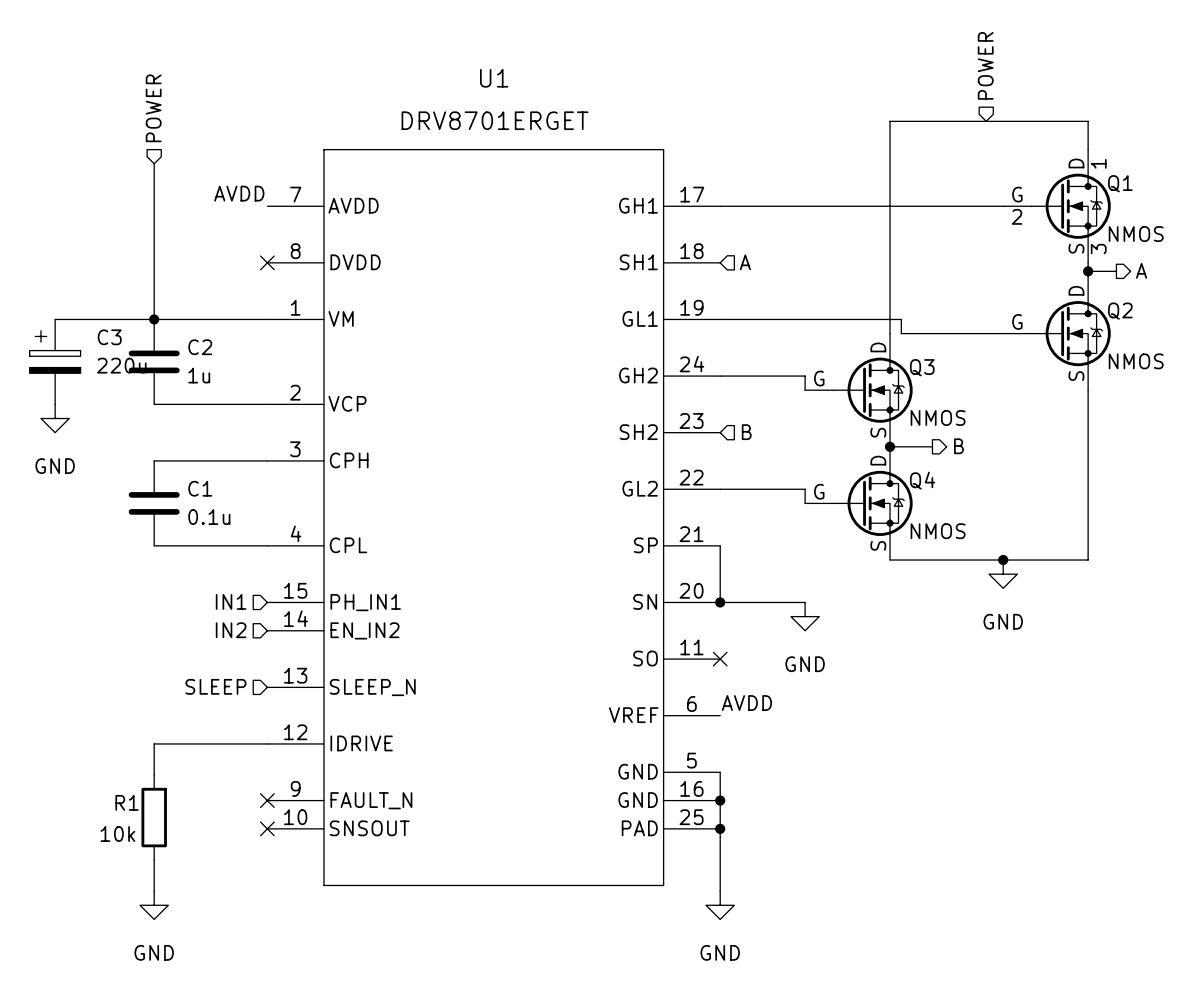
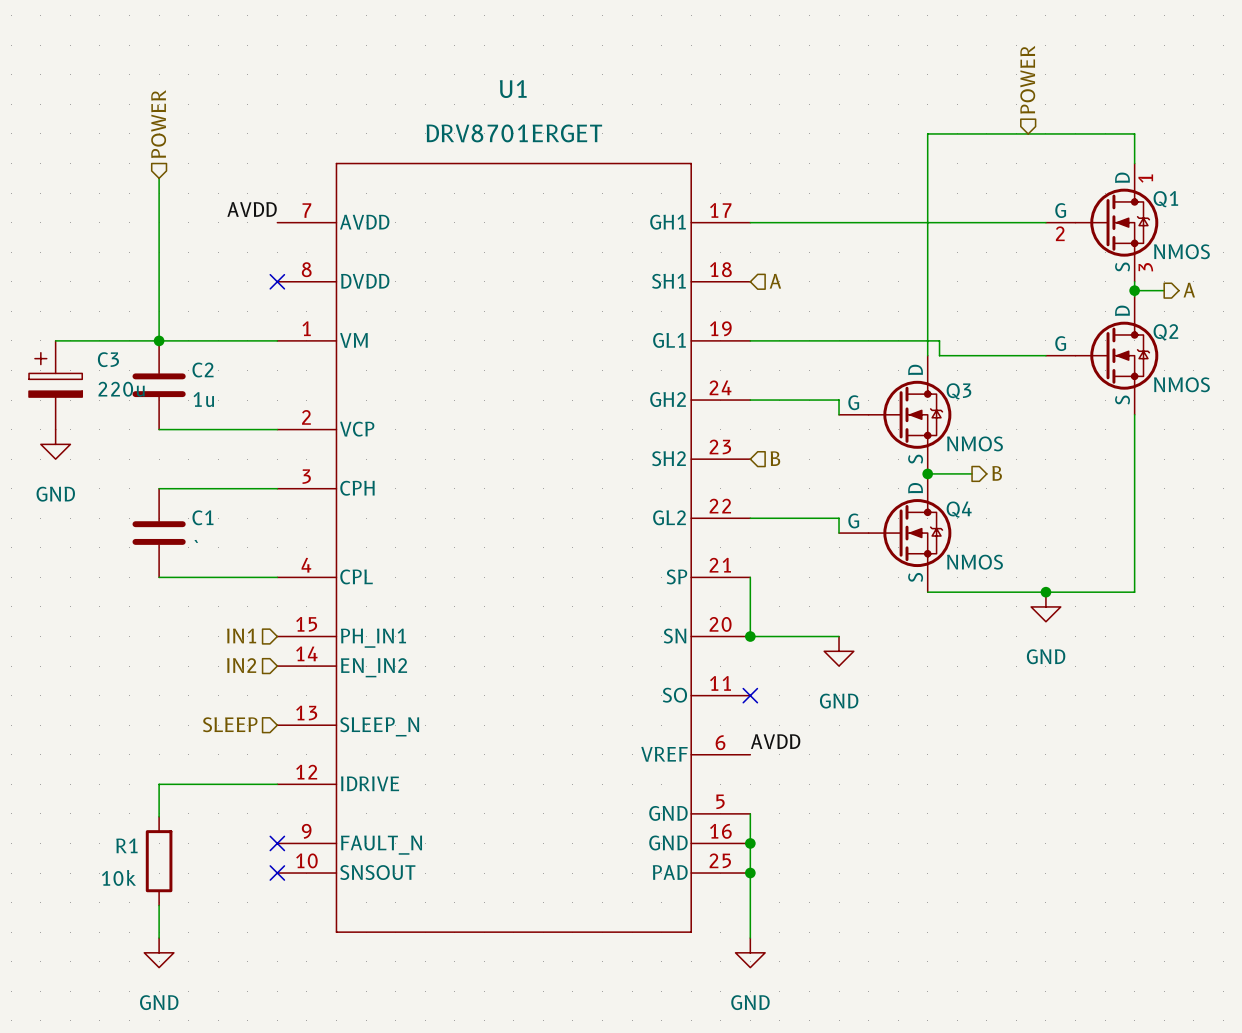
C1 value: 0.1u (209, 517) -> ` (196, 541)

